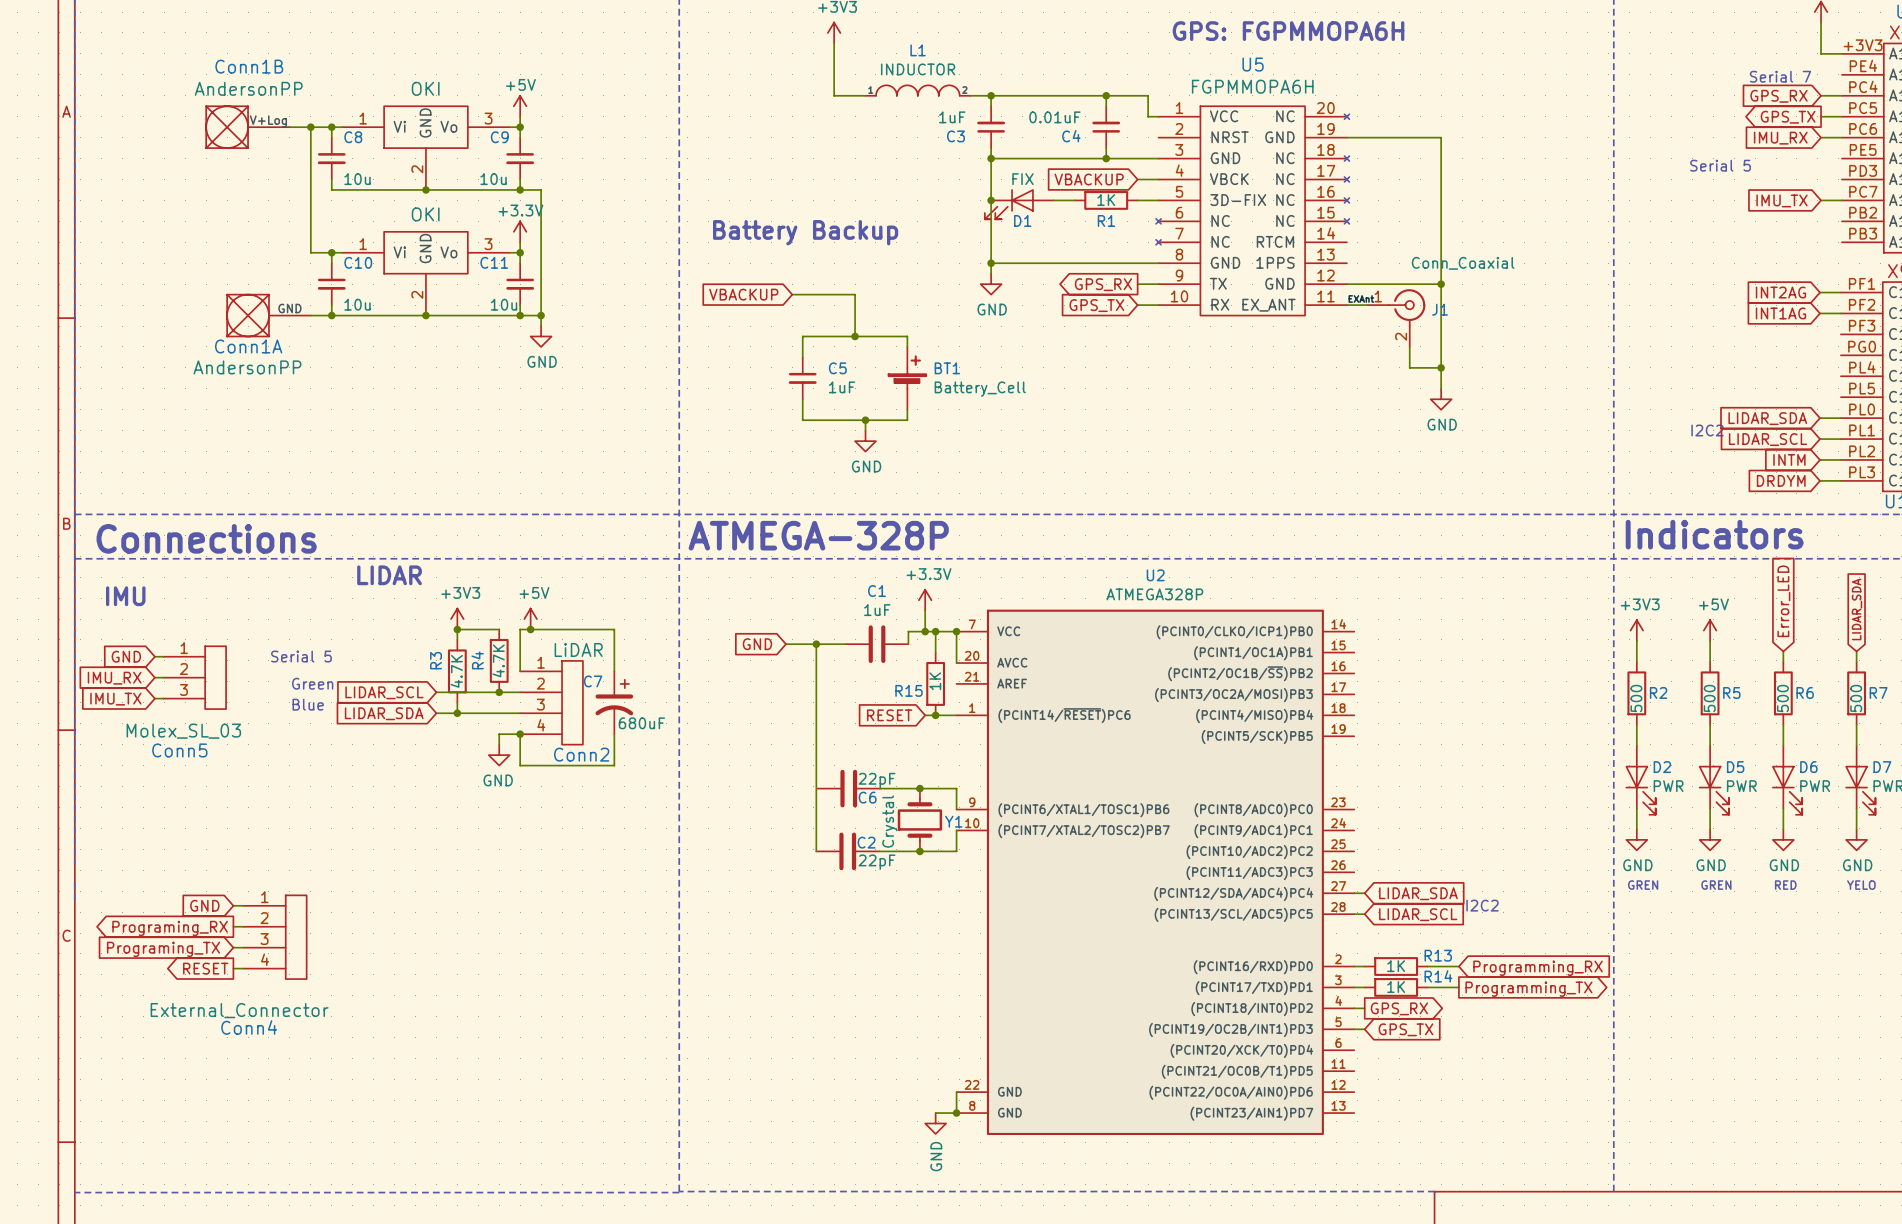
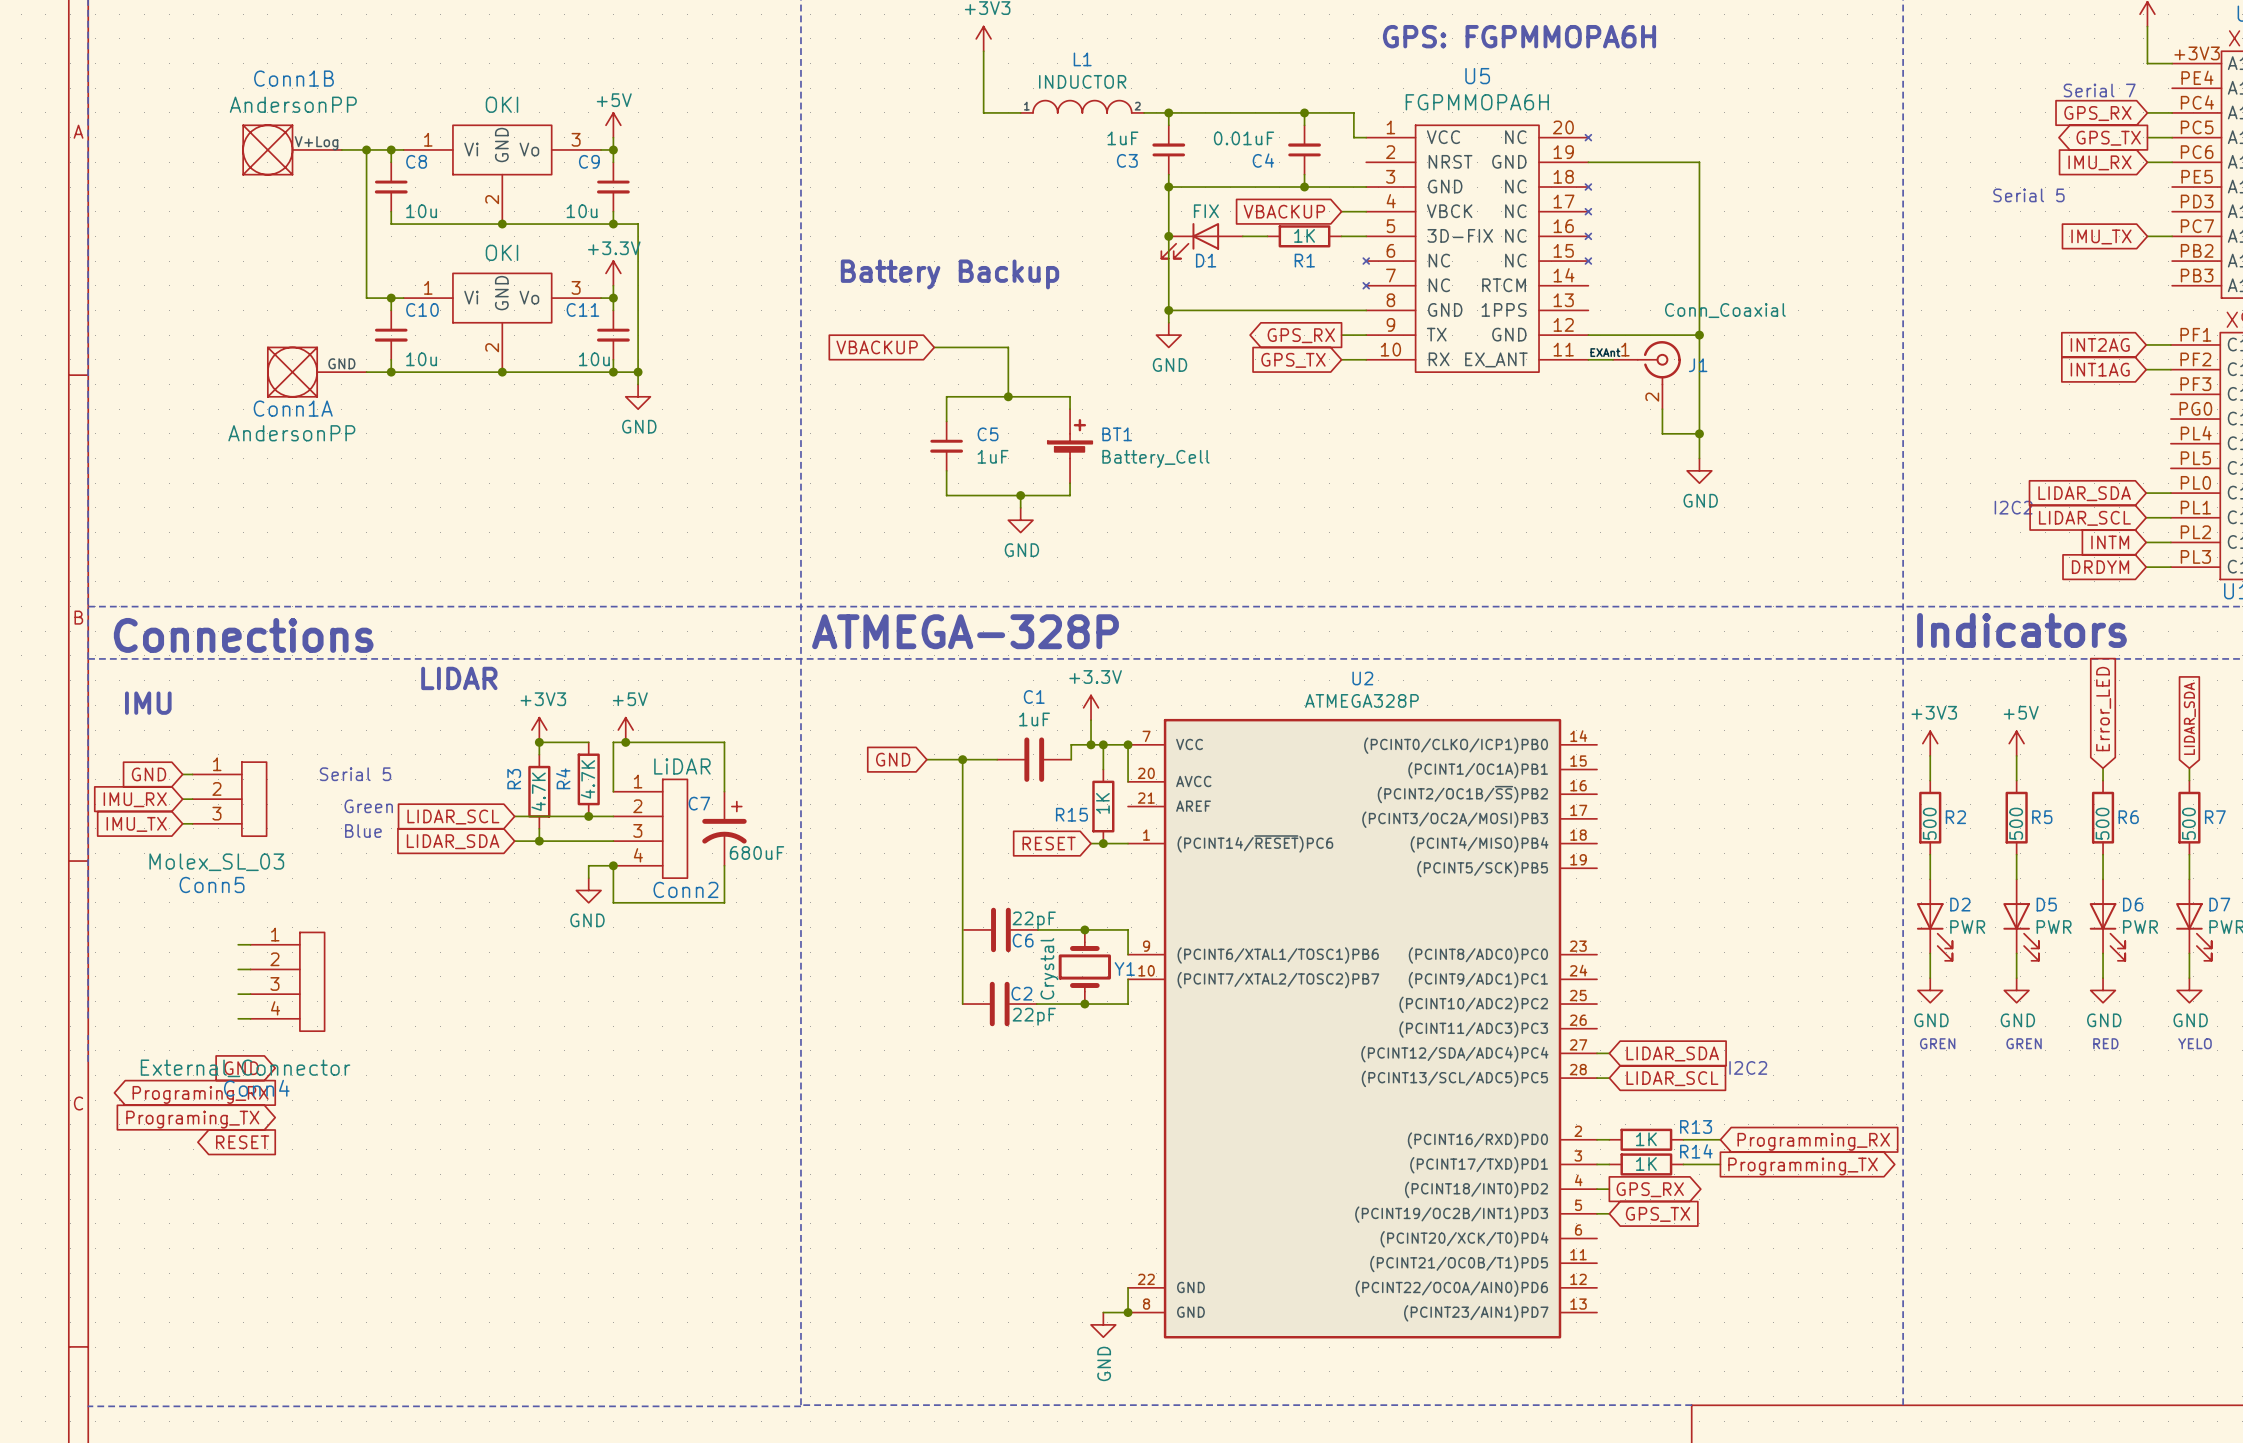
wire: (233, 905) (243, 905) -> (238, 944) (250, 944)
wire: (233, 926) (243, 926) -> (238, 969) (250, 969)
Conn4 position: (275, 937) -> (287, 981)
wire: (233, 947) (243, 947) -> (238, 994) (250, 994)
wire: (233, 968) (243, 968) -> (238, 1018) (250, 1018)

